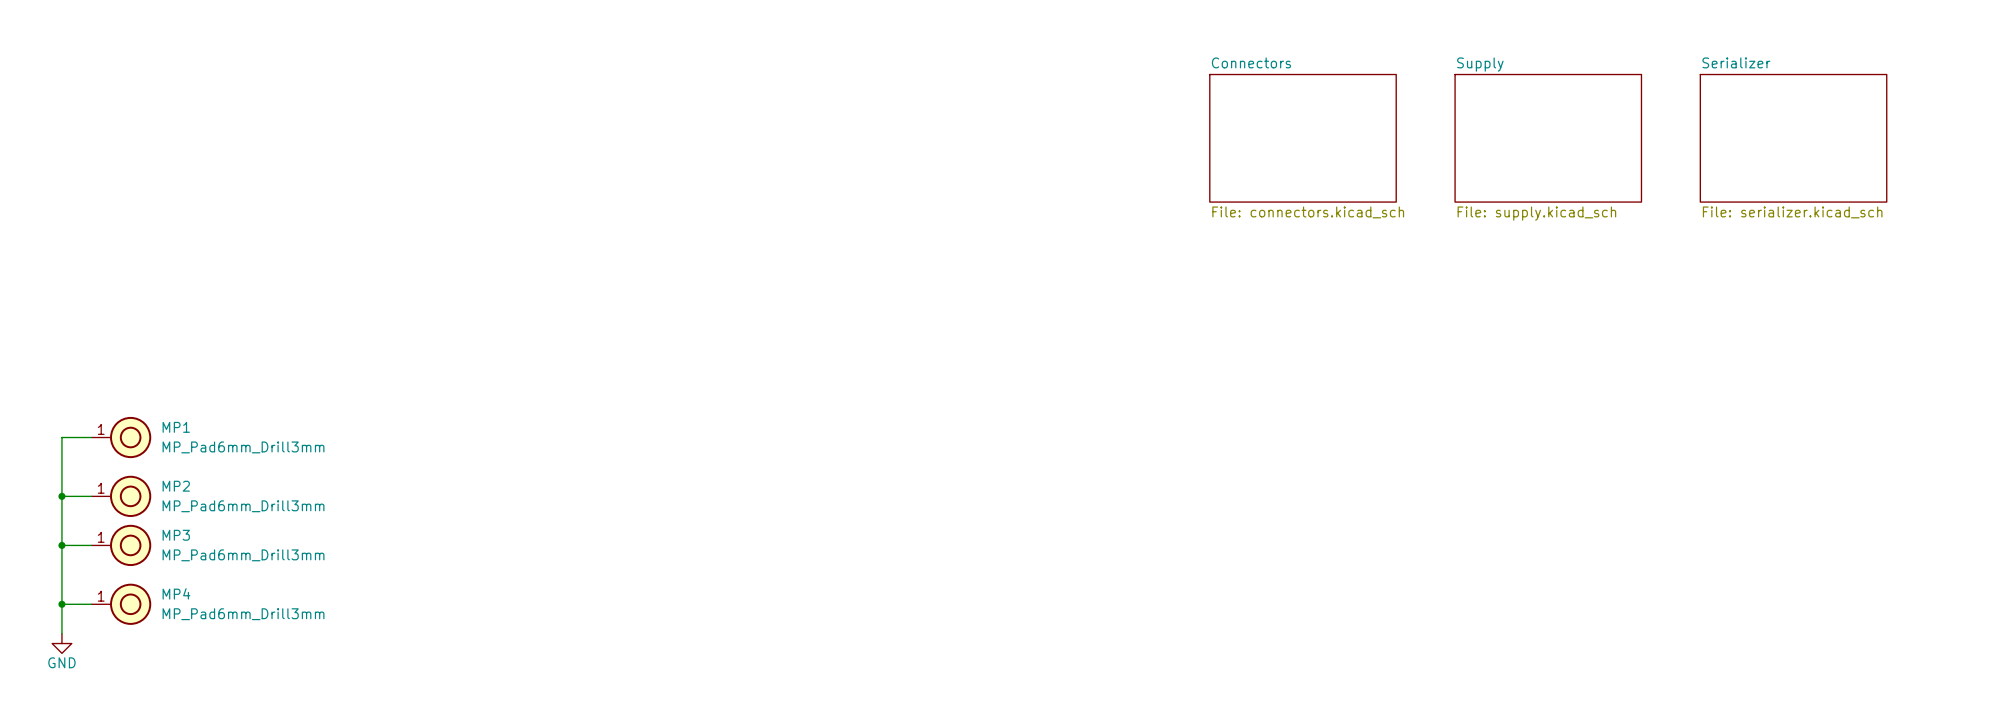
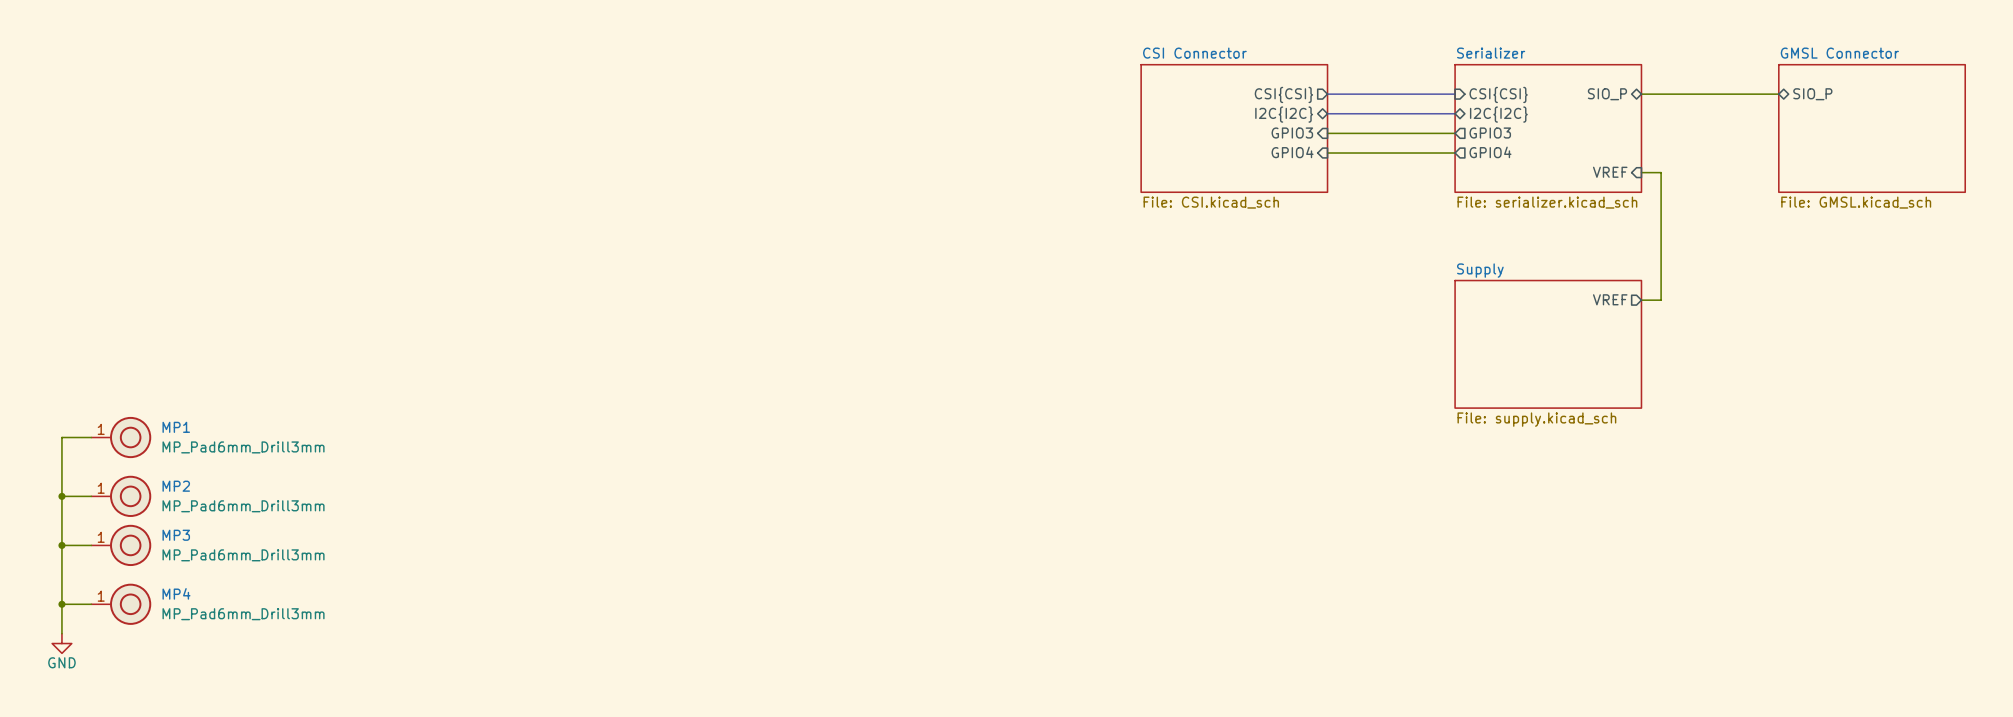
sheet pin: none -> CSI{CSI} (1283, 94)
bus: none -> (1327, 94) (1455, 94)
sheet pin: none -> CSI{CSI} (1498, 94)
sheet pin: none -> SIO_P (1607, 94)
wire: none -> (1641, 94) (1778, 94)
sheet pin: none -> SIO_P (1812, 94)
bus: none -> (1327, 113) (1455, 113)
sheet pin: none -> I2C{I2C} (1284, 114)
sheet pin: none -> I2C{I2C} (1498, 114)
sheet CSI Connector: none -> File: CSI.kicad_sch (1234, 128)
sheet Serializer: none -> File: serializer.kicad_sch (1548, 128)
sheet GMSL Connector: none -> File: GMSL.kicad_sch (1872, 128)
sheet pin: none -> GPIO3 (1292, 133)
wire: none -> (1327, 133) (1455, 133)
sheet pin: none -> GPIO3 (1490, 133)
sheet Connectors: File: connectors.kicad_sch (1303, 138) -> none
sheet Supply: File: supply.kicad_sch (1548, 138) -> none
sheet Serializer: File: serializer.kicad_sch (1793, 138) -> none
sheet pin: none -> GPIO4 (1292, 152)
sheet pin: none -> GPIO4 (1490, 152)
wire: none -> (1327, 153) (1455, 153)
sheet pin: none -> VREF (1610, 172)
wire: none -> (1641, 172) (1661, 172) (1661, 300) (1641, 300)
sheet pin: none -> VREF (1610, 299)
sheet Supply: none -> File: supply.kicad_sch (1548, 344)

